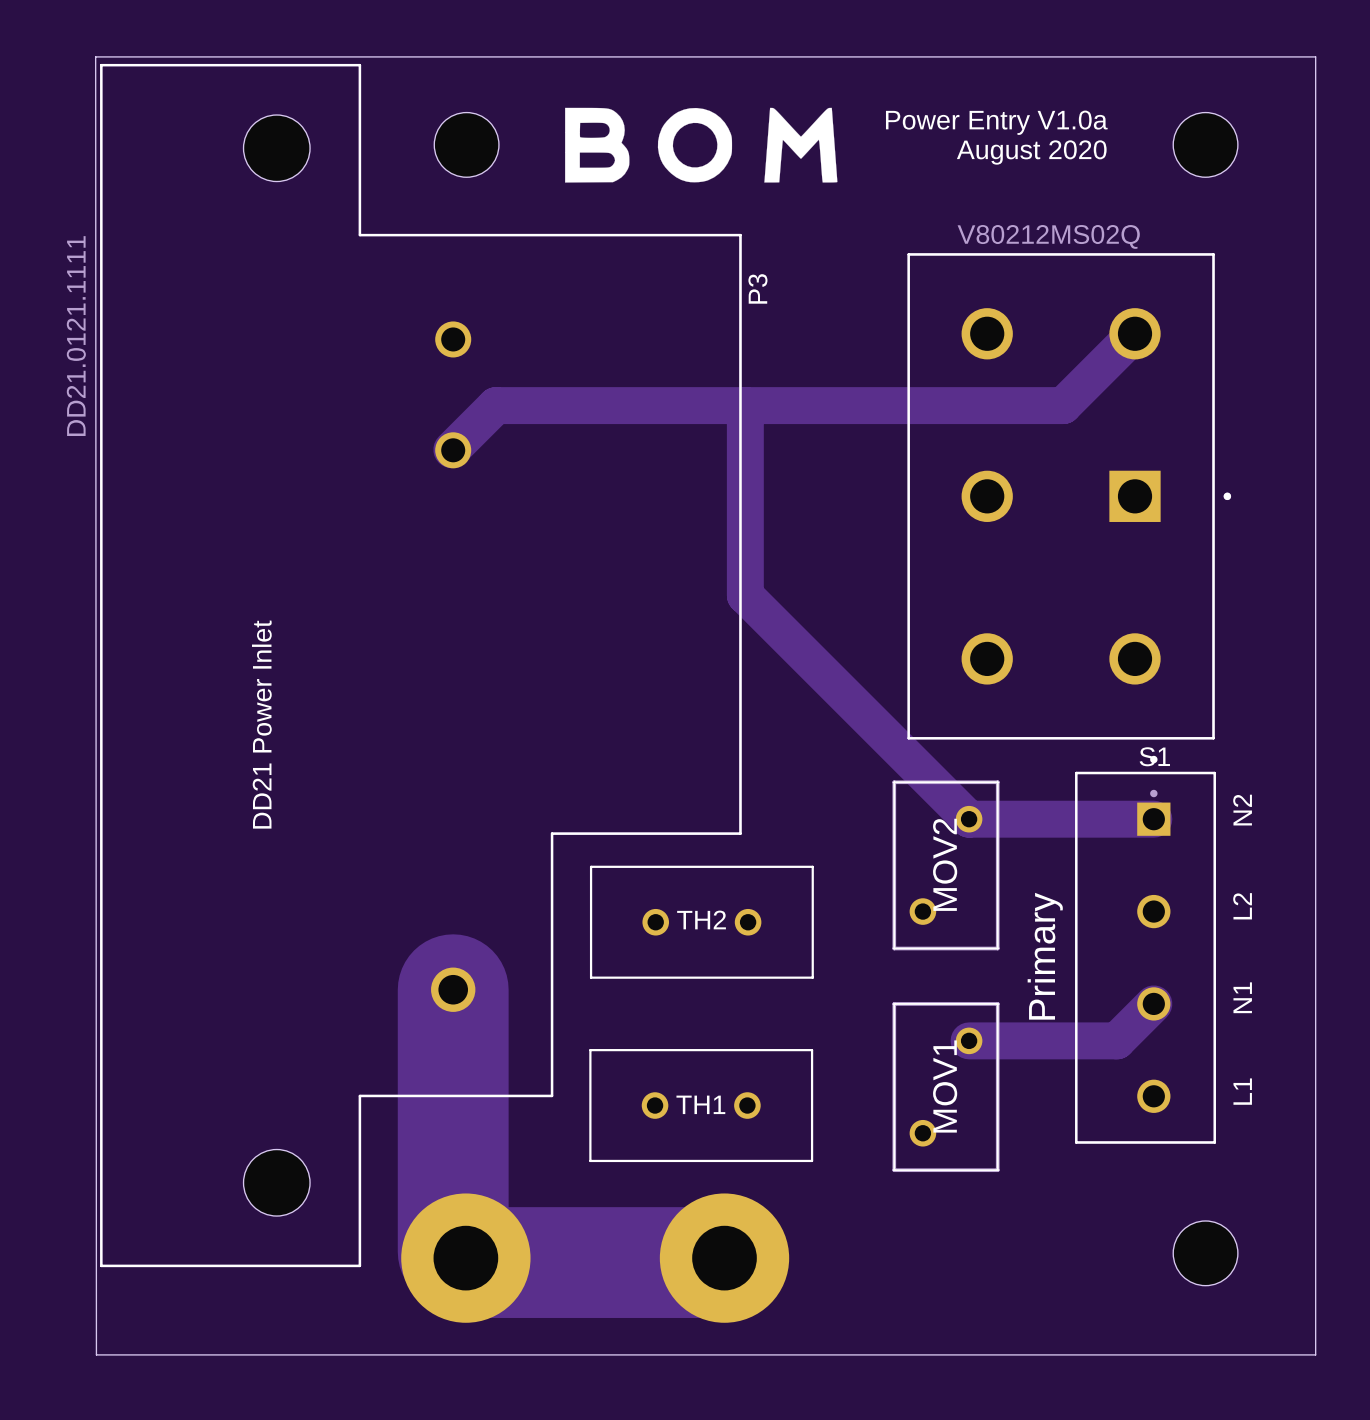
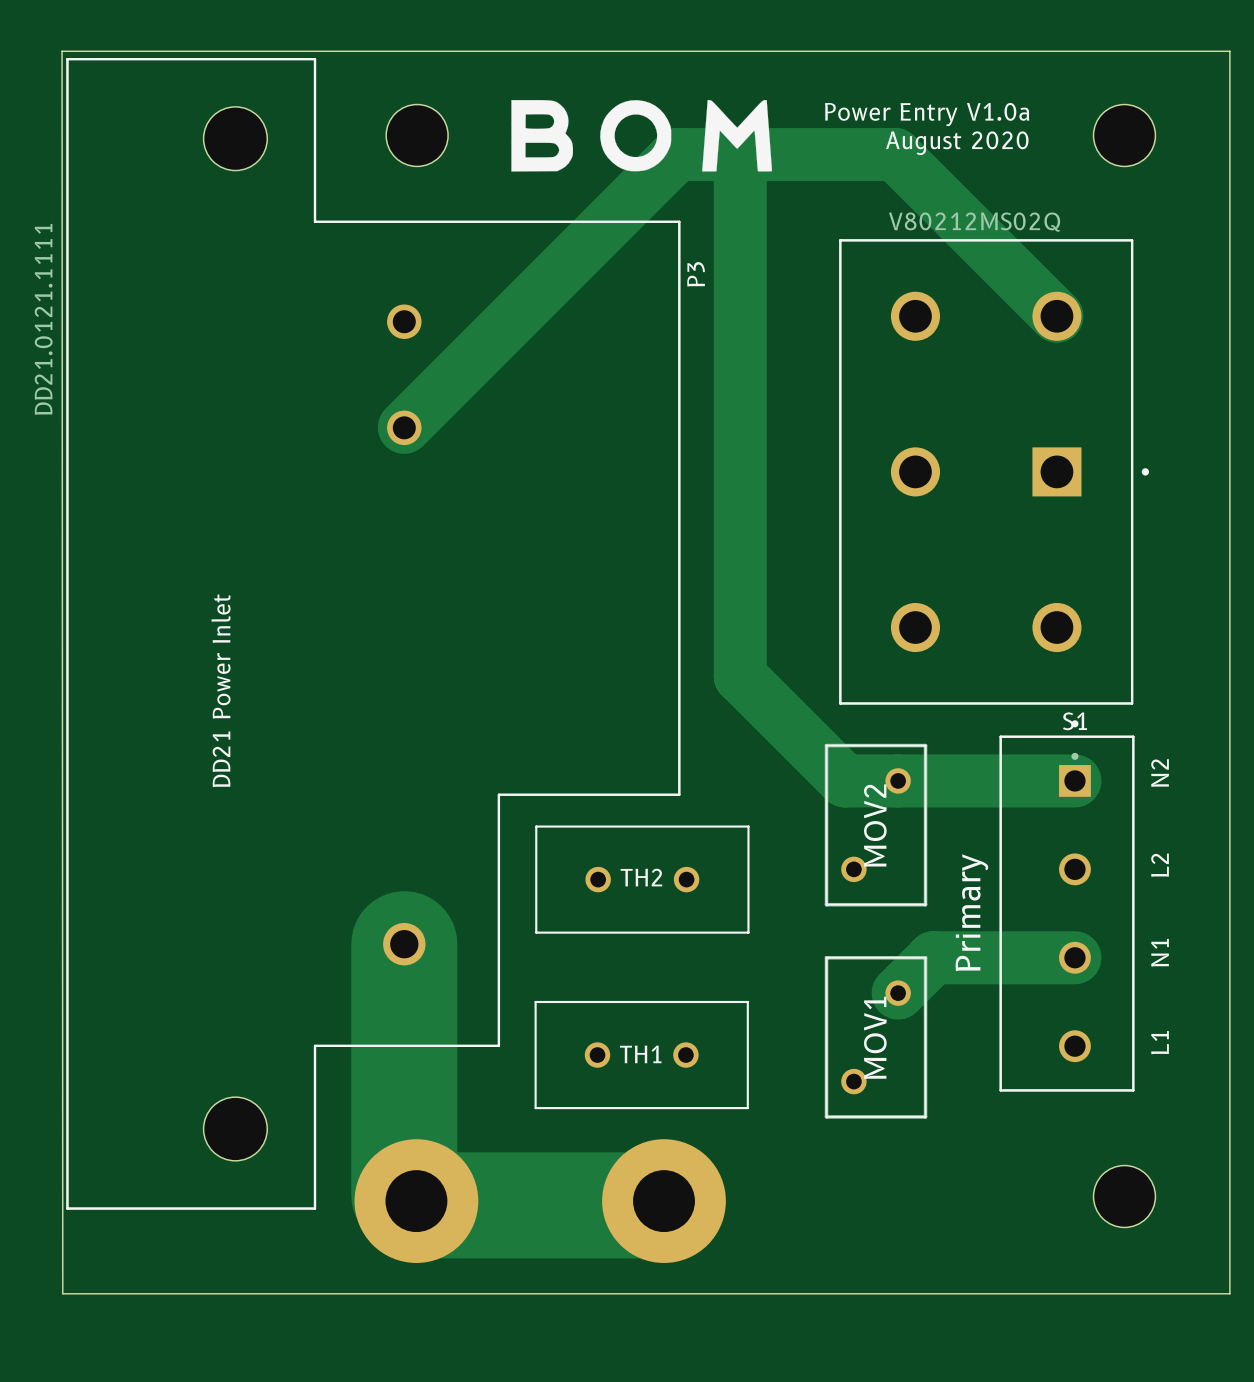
track: (1135, 333) (1063, 405) (495, 405) (451, 449) -> (1056, 316) (895, 154) (677, 154) (404, 427)
track: (745, 405) (745, 595) (969, 819) -> (740, 154) (740, 676) (845, 780) (898, 780)
track width: thin (969, 819) (1153, 819) -> thick (898, 780) (1074, 780)
track: (1153, 1003) (1116, 1040) (969, 1040) -> (1074, 957) (933, 957) (898, 993)

